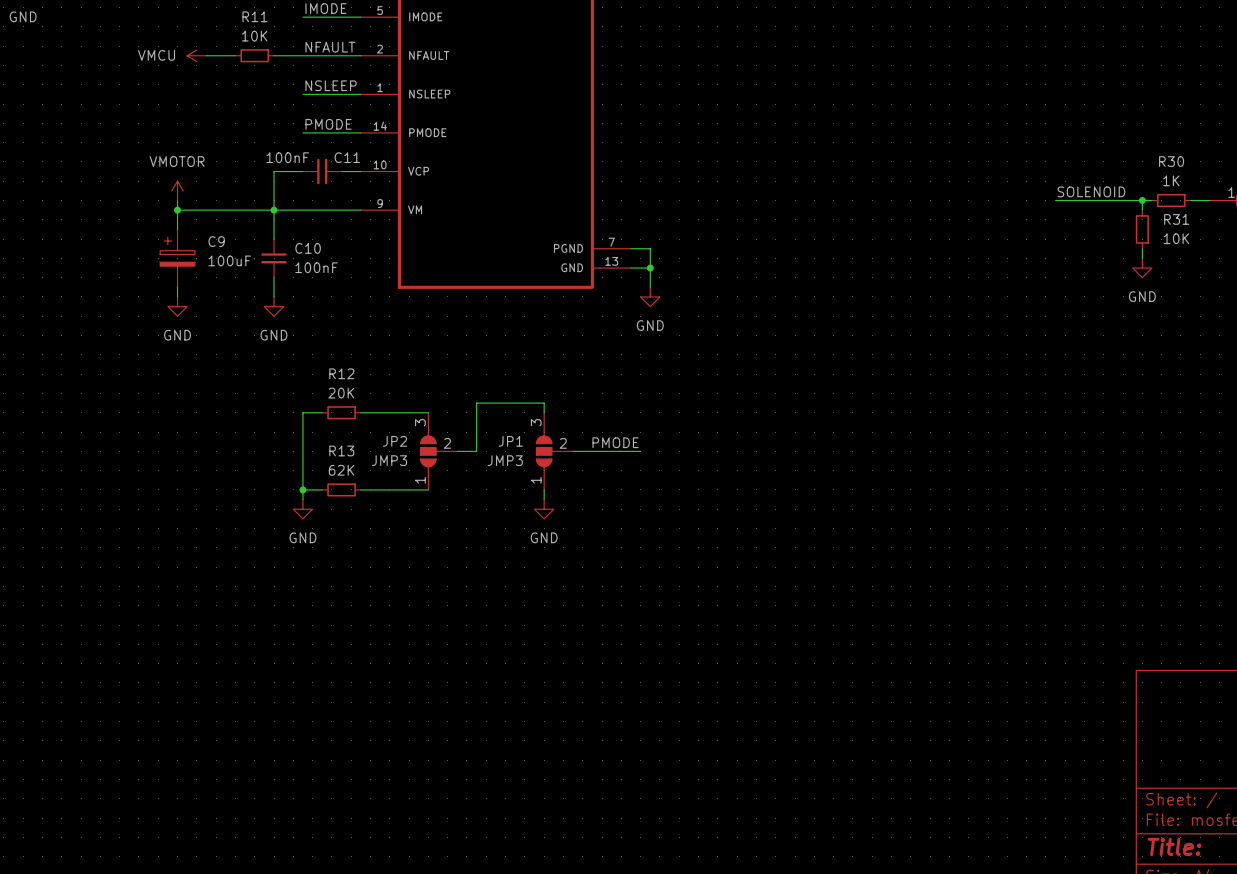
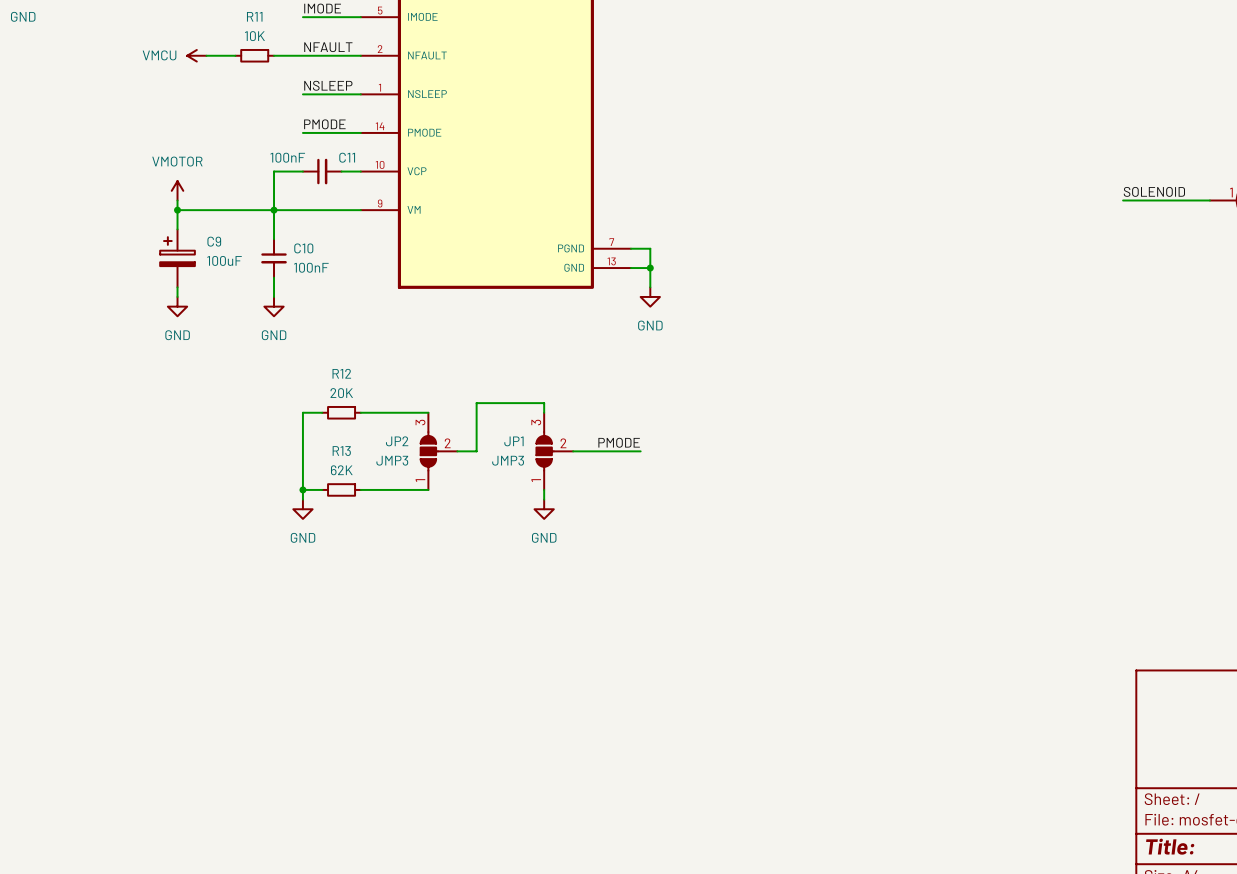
label position: SOLENOID (1091, 191) -> SOLENOID (1154, 191)
wire: (1055, 200) (1123, 200) -> none
wire: (1142, 200) (1142, 210) -> none
junction: (1142, 200) -> none
wire: none -> (1152, 200) (1190, 200)
R30: 1K (1171, 200) -> none
R31: 10K (1142, 229) -> none
wire: (1142, 248) (1142, 258) -> none
power symbol: GND (1142, 268) -> none

